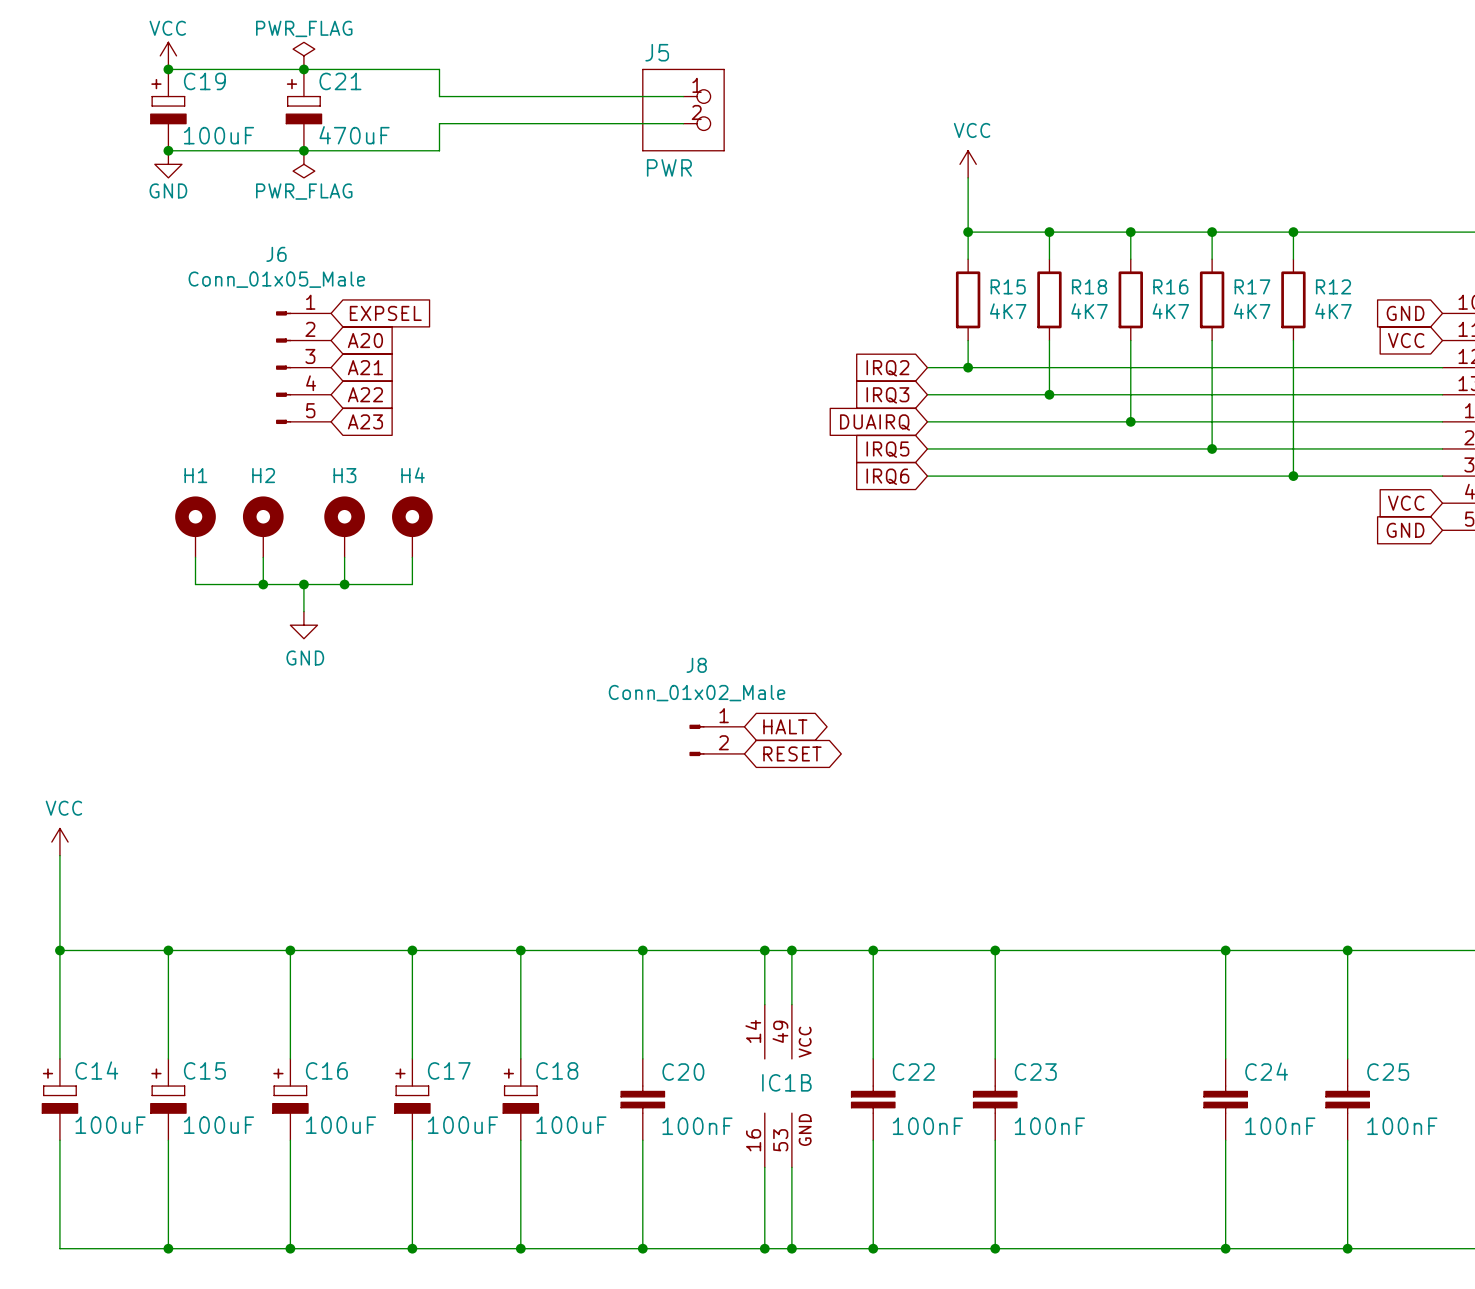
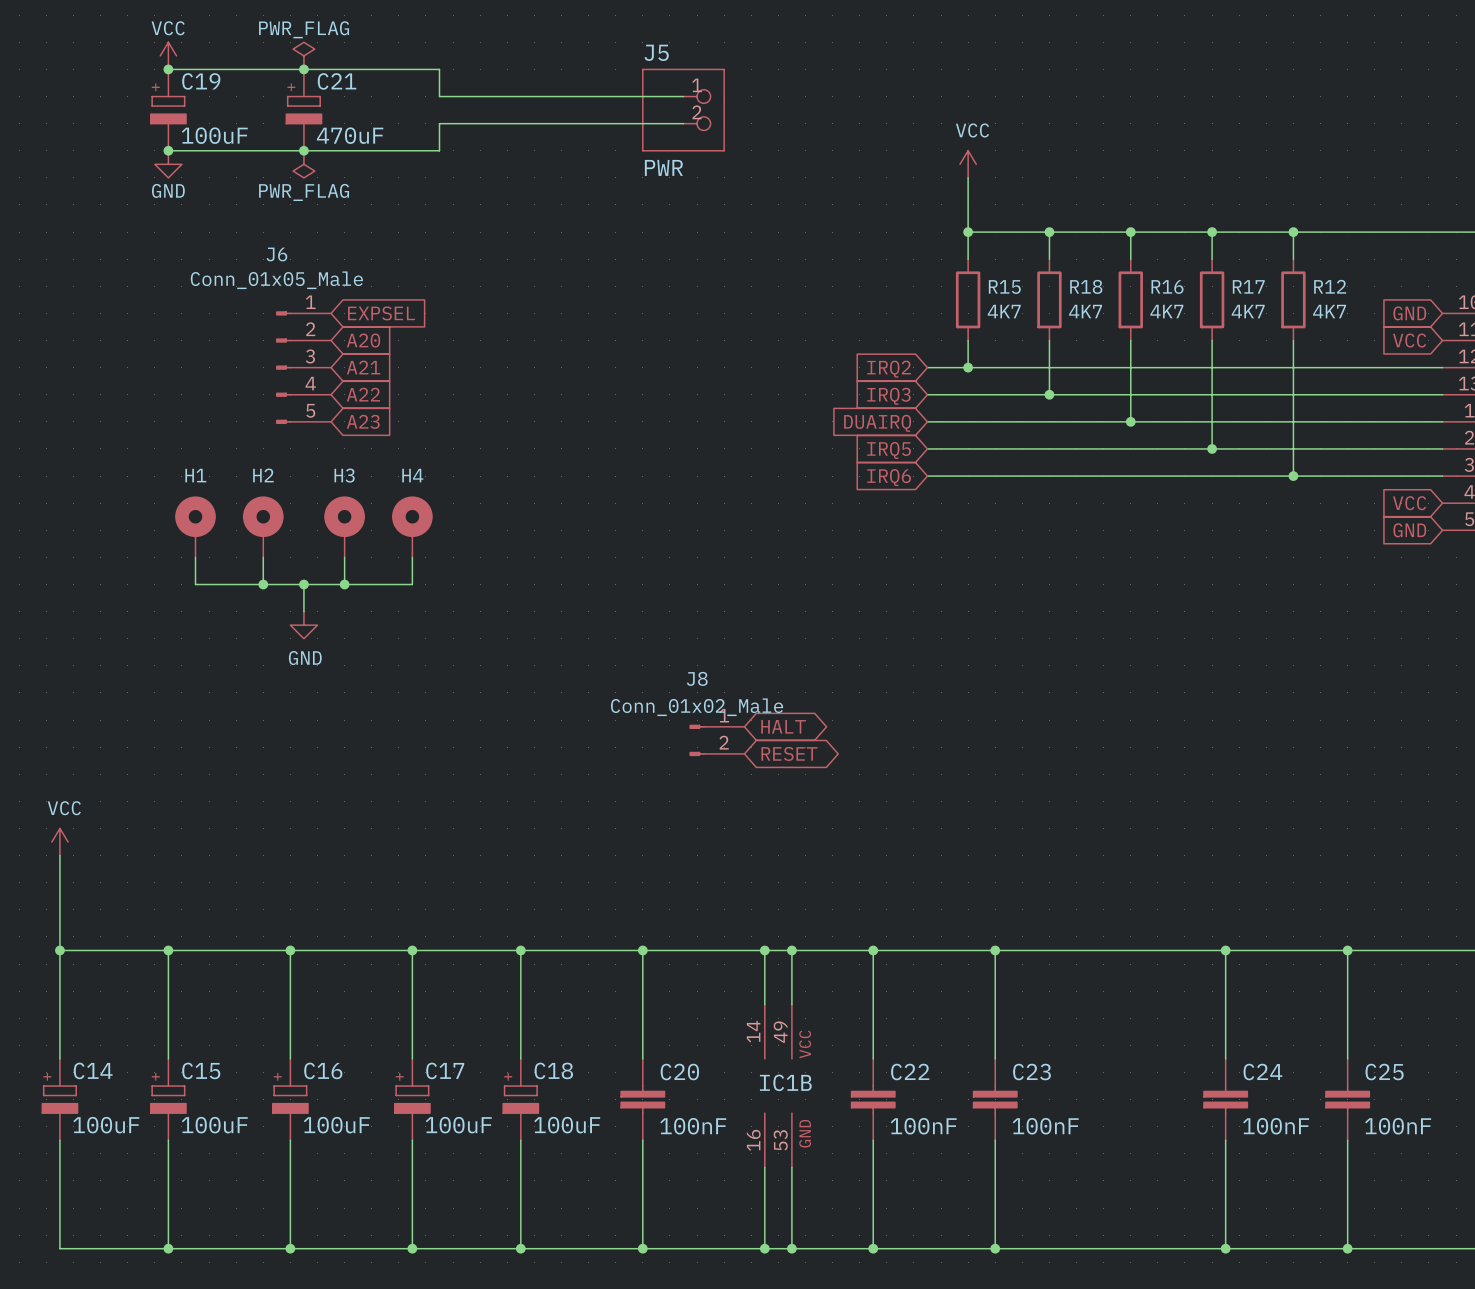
J8 name position: J8 (696, 665) -> J8 (697, 678)
J8 value position: Conn_01x02_Male (697, 693) -> Conn_01x02_Male (697, 707)

